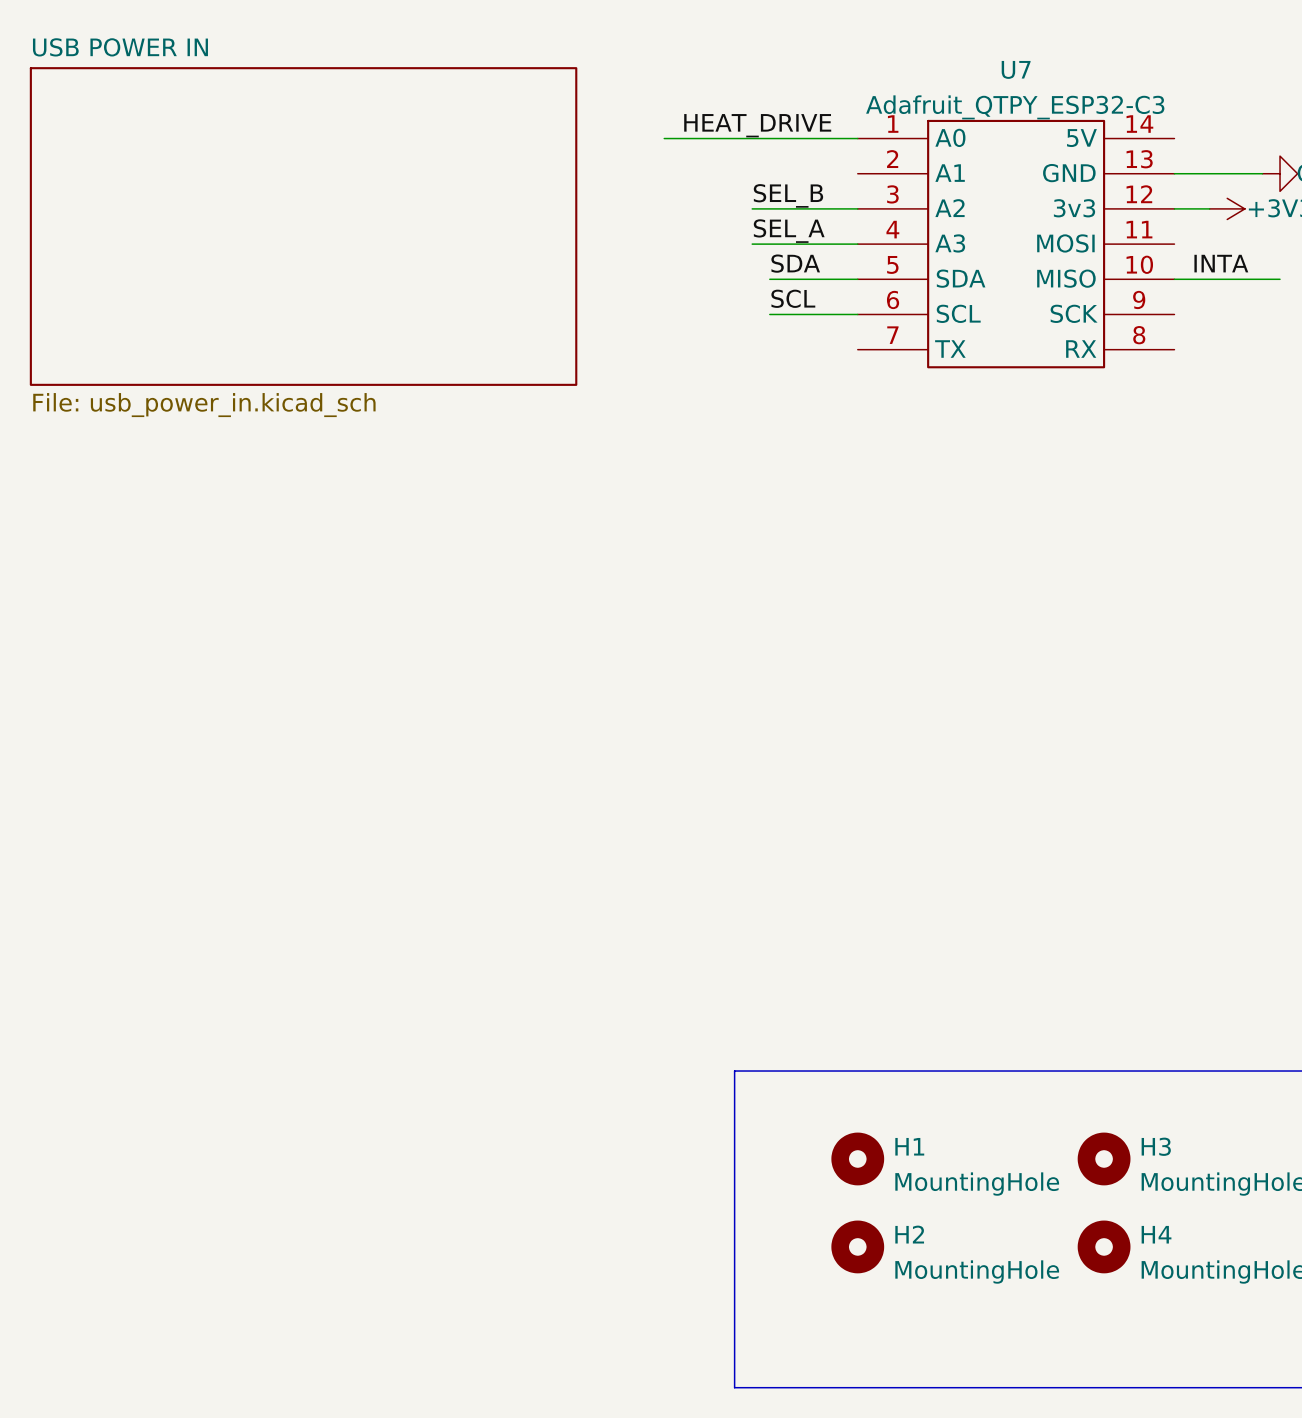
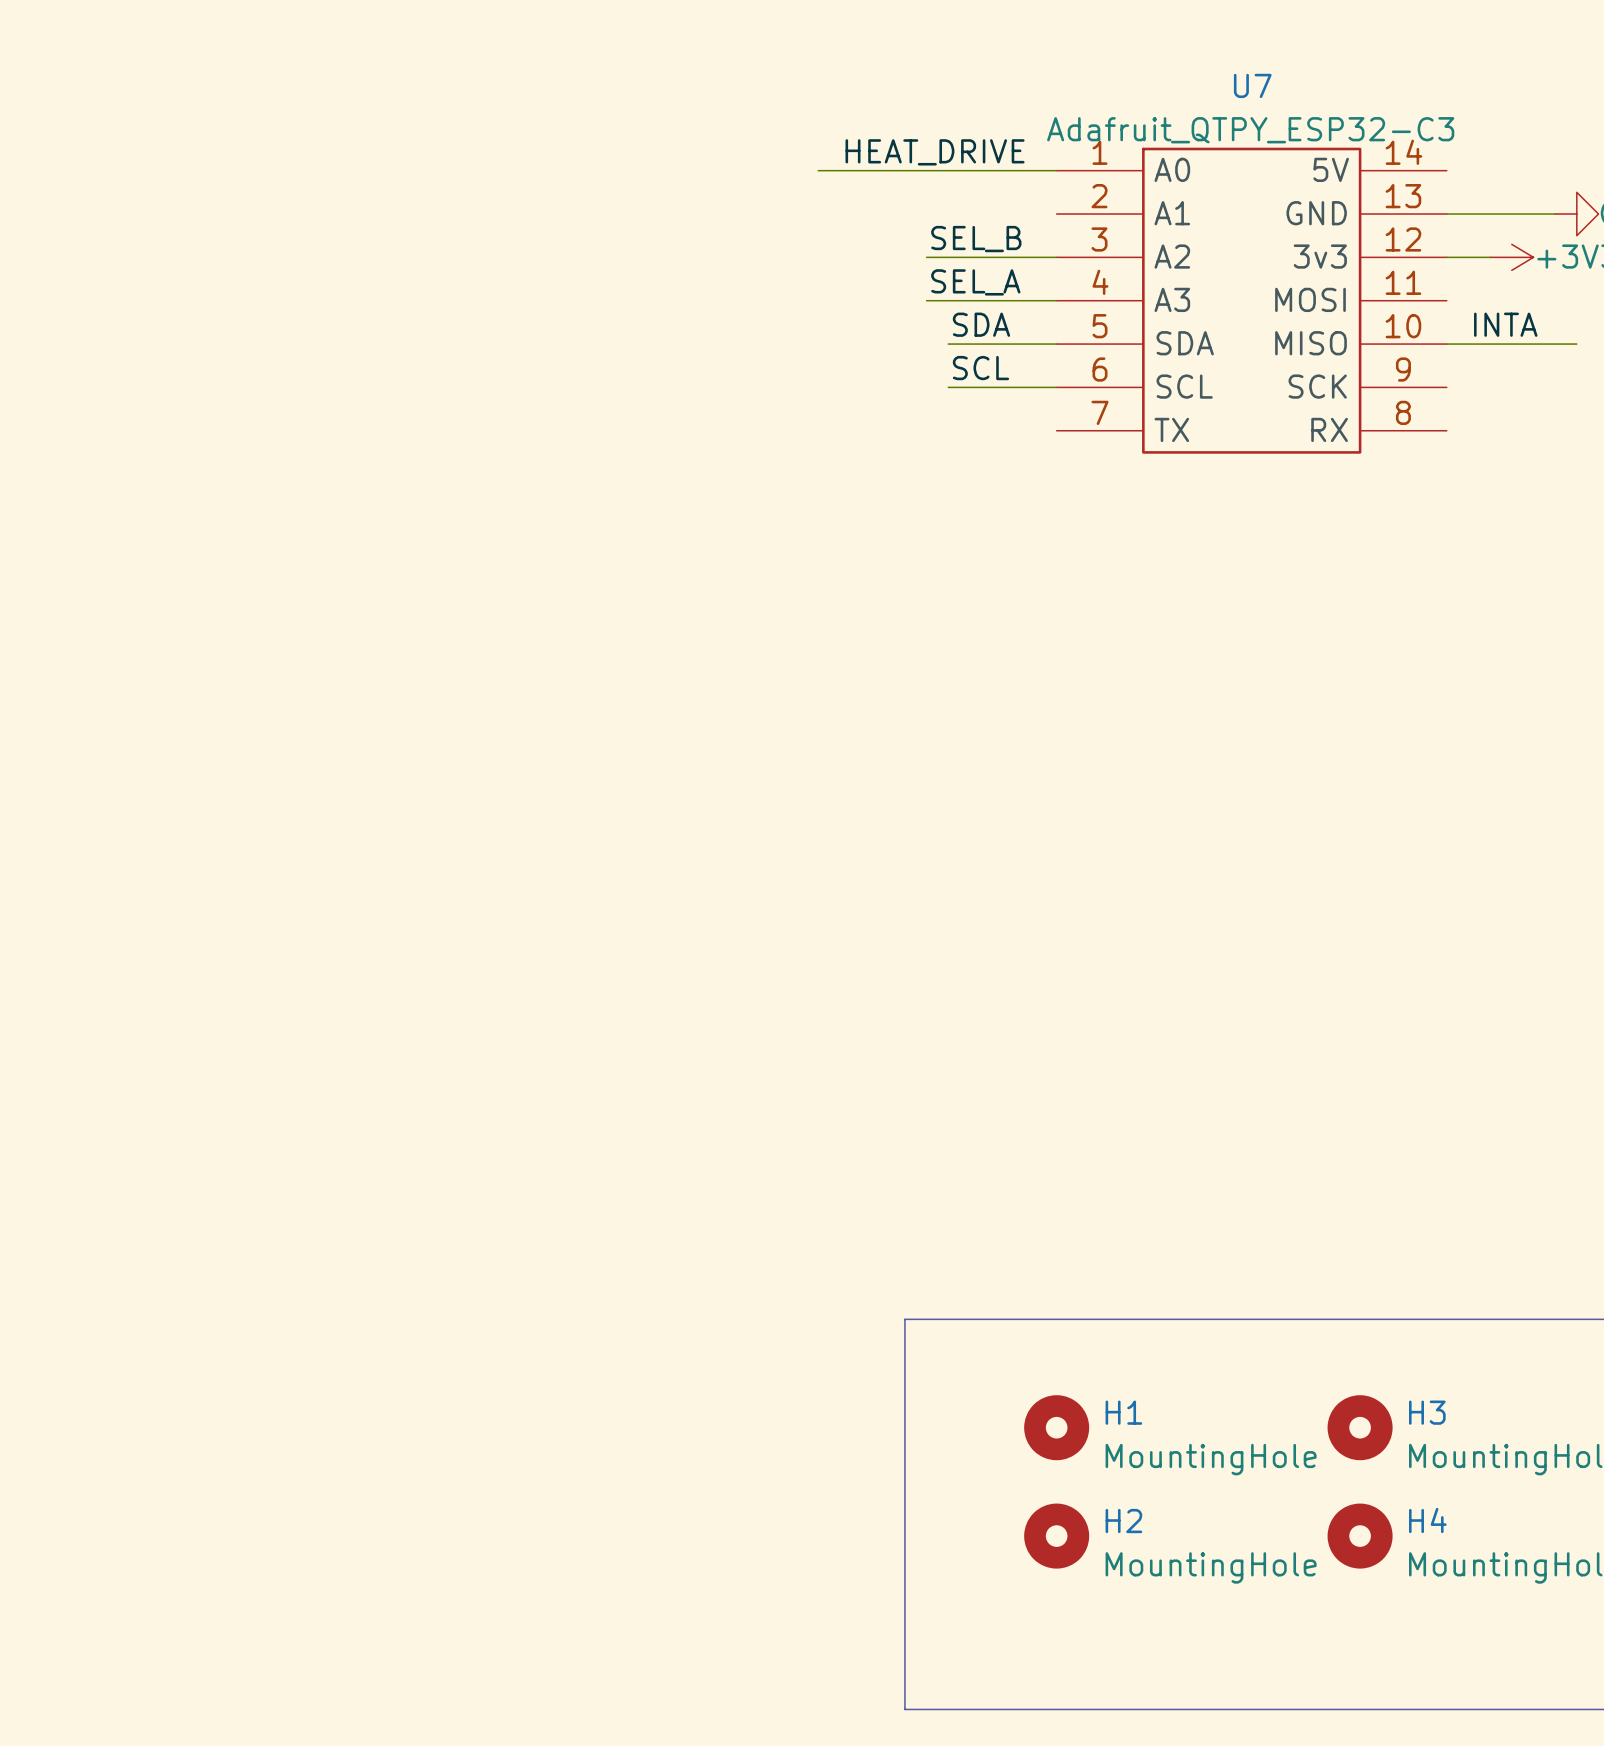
sheet USB POWER IN: File: usb_power_in.kicad_sch (303, 226) -> none

